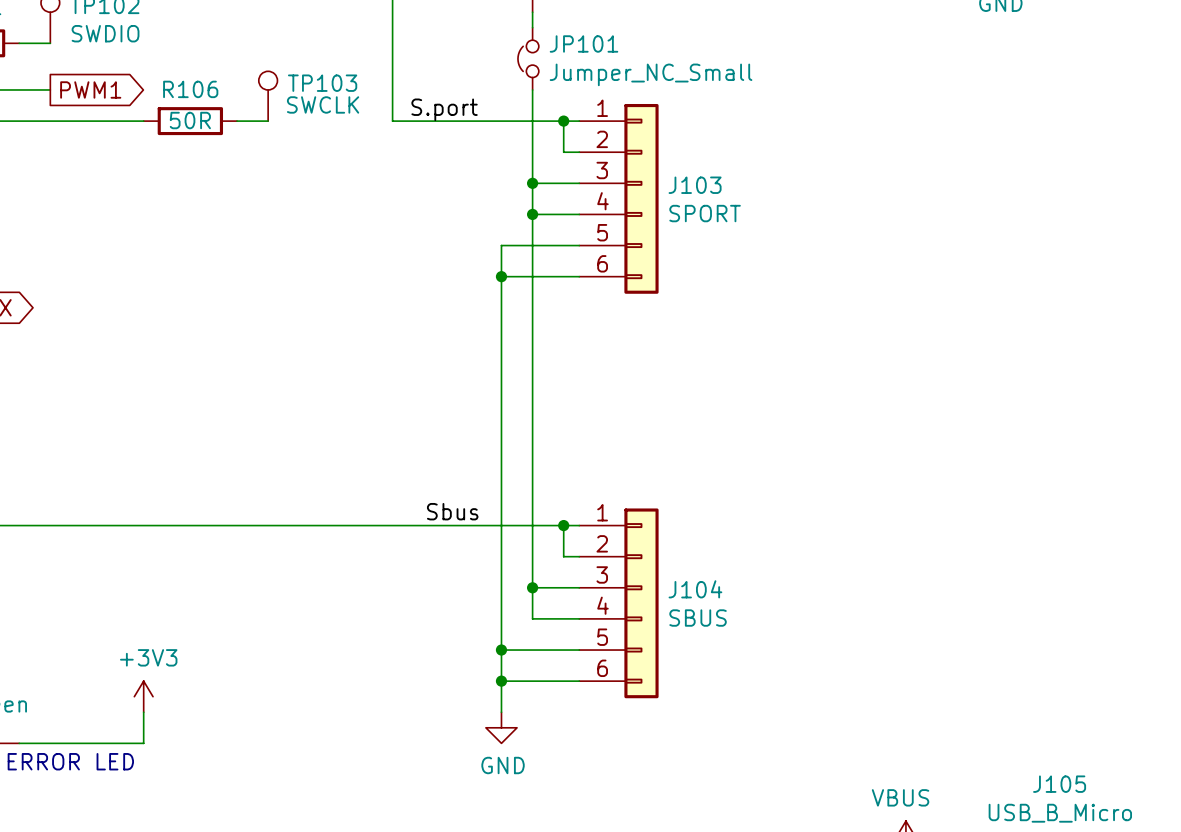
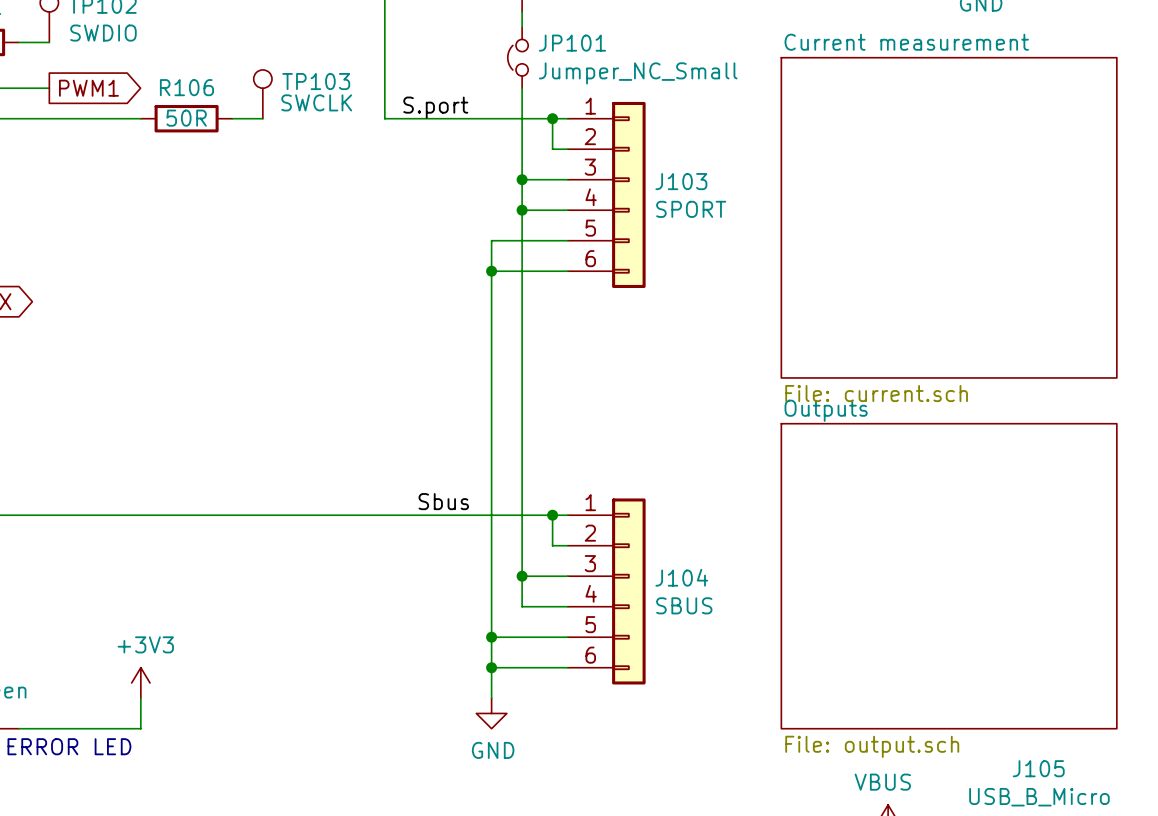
sheet Current measurement: none -> File: current.sch (949, 217)
sheet Outputs: none -> File: output.sch (949, 576)

